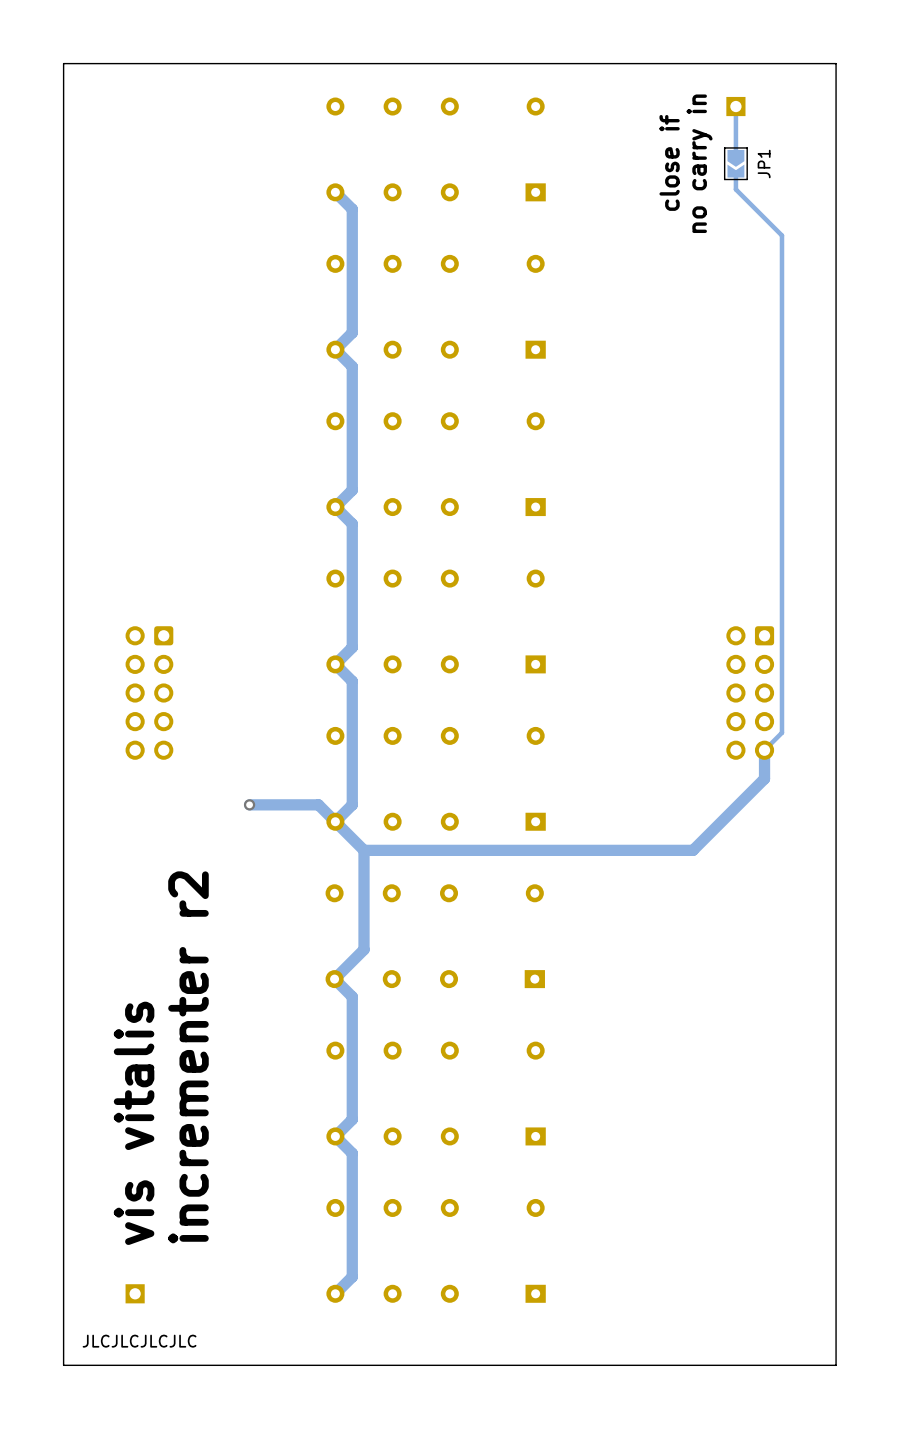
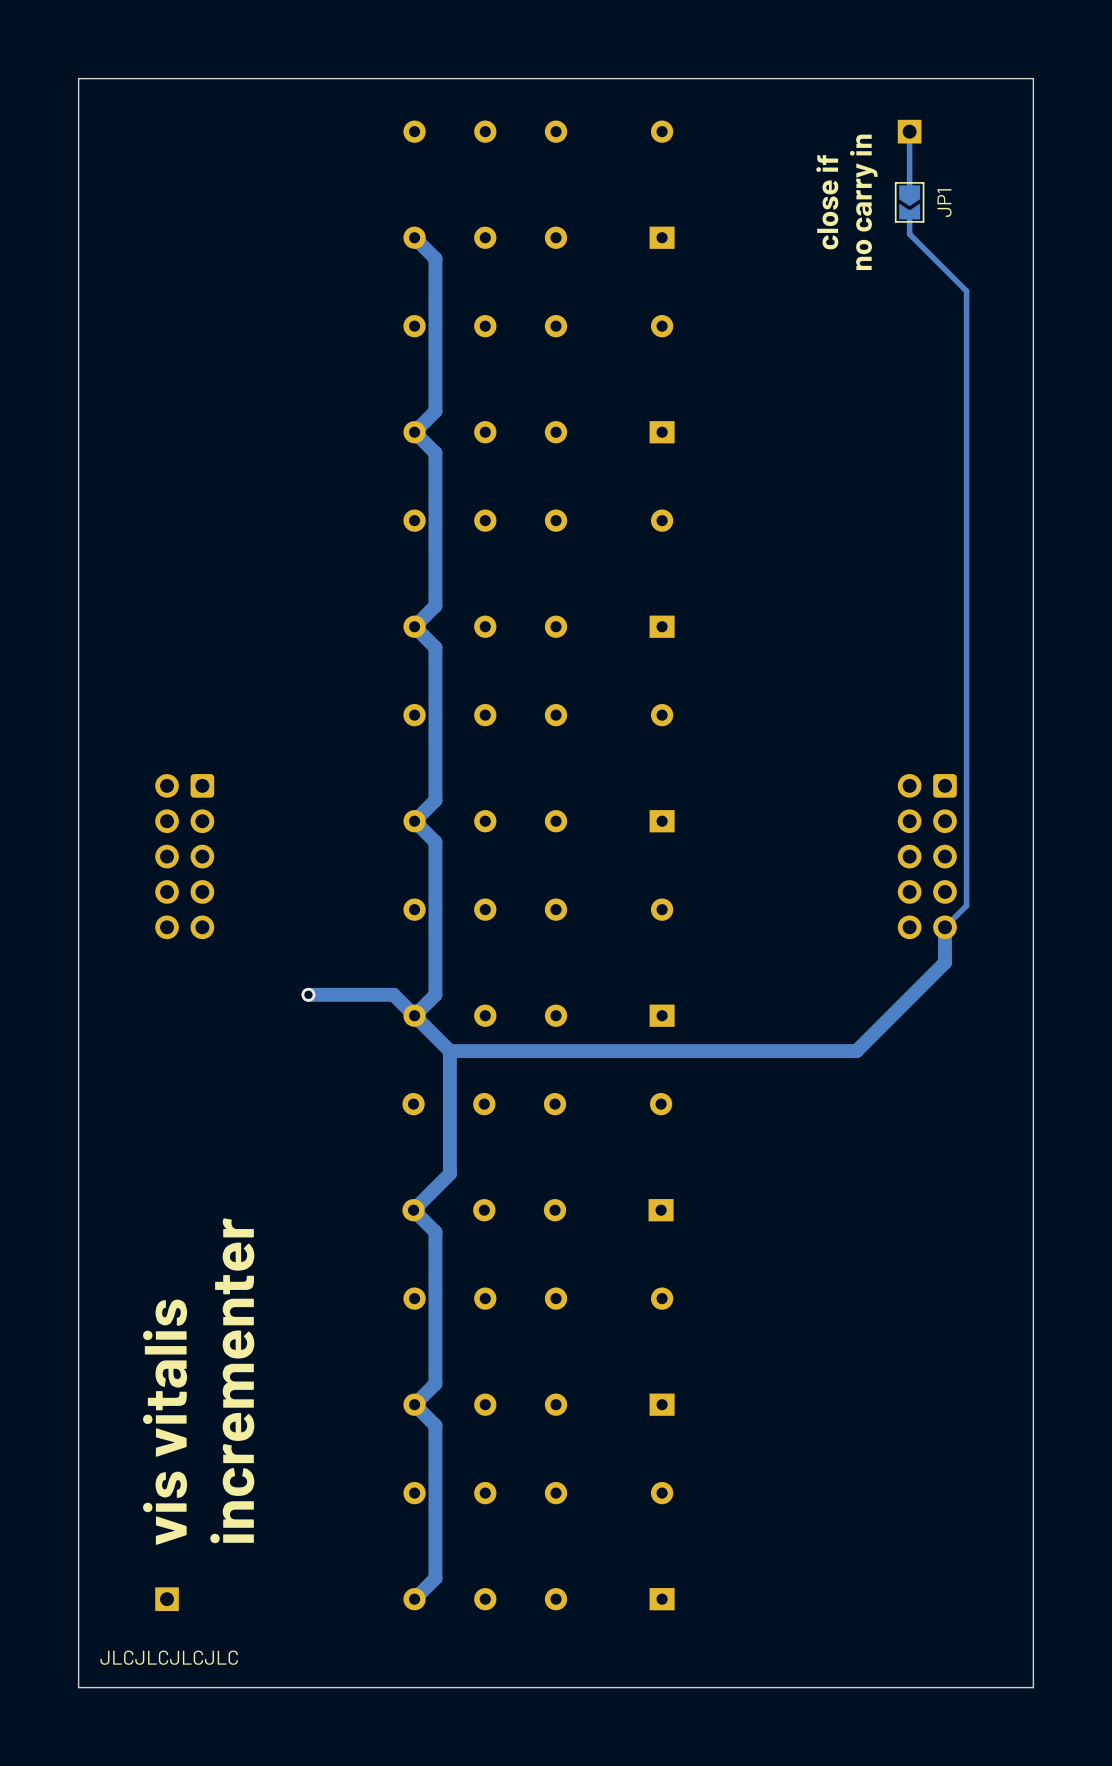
text: incrementer r2 (188, 1057) -> incrementer (232, 1380)

